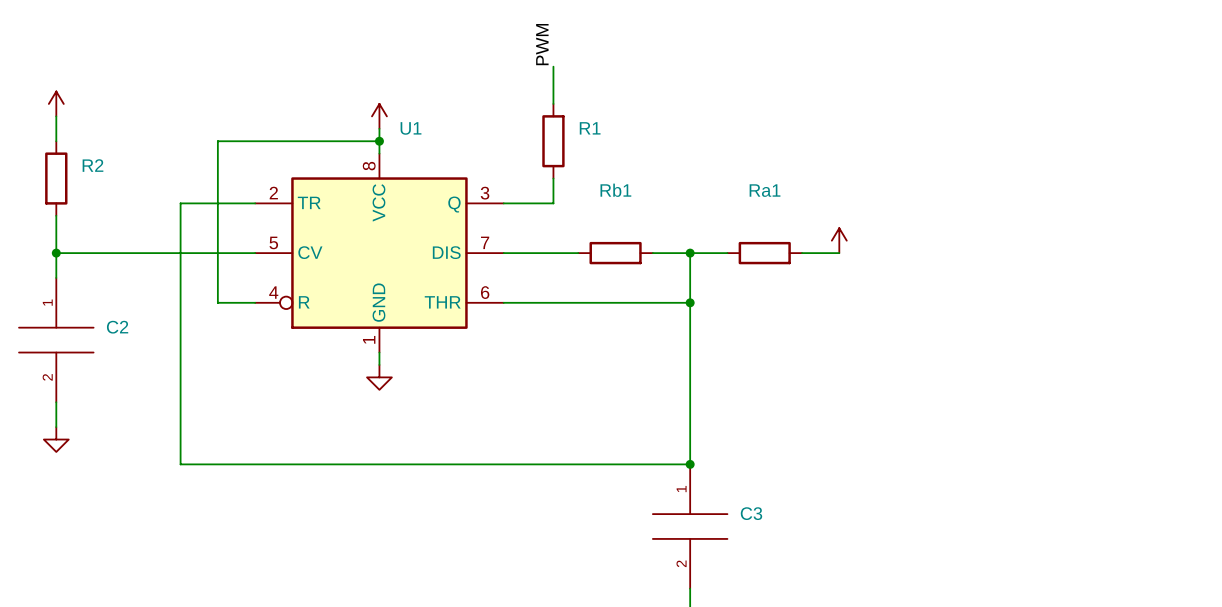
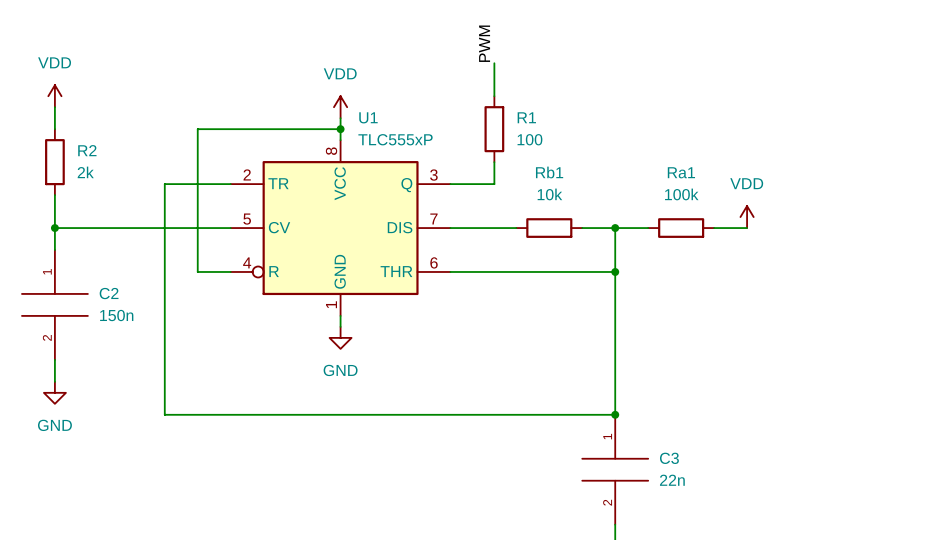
power symbol text: none -> VDD (54, 62)
power symbol text: none -> VDD (340, 73)
U1 value: none -> TLC555xP (395, 139)
R1 value: none -> 100 (529, 139)
R2 value: none -> 2k (85, 172)
power symbol text: none -> VDD (746, 183)
Rb1 value: none -> 10k (549, 194)
Ra1 value: none -> 100k (681, 194)
C2 value: none -> 150n (116, 315)
power symbol text: none -> GND (340, 370)
power symbol text: none -> GND (54, 425)
C3 value: none -> 22n (672, 480)

